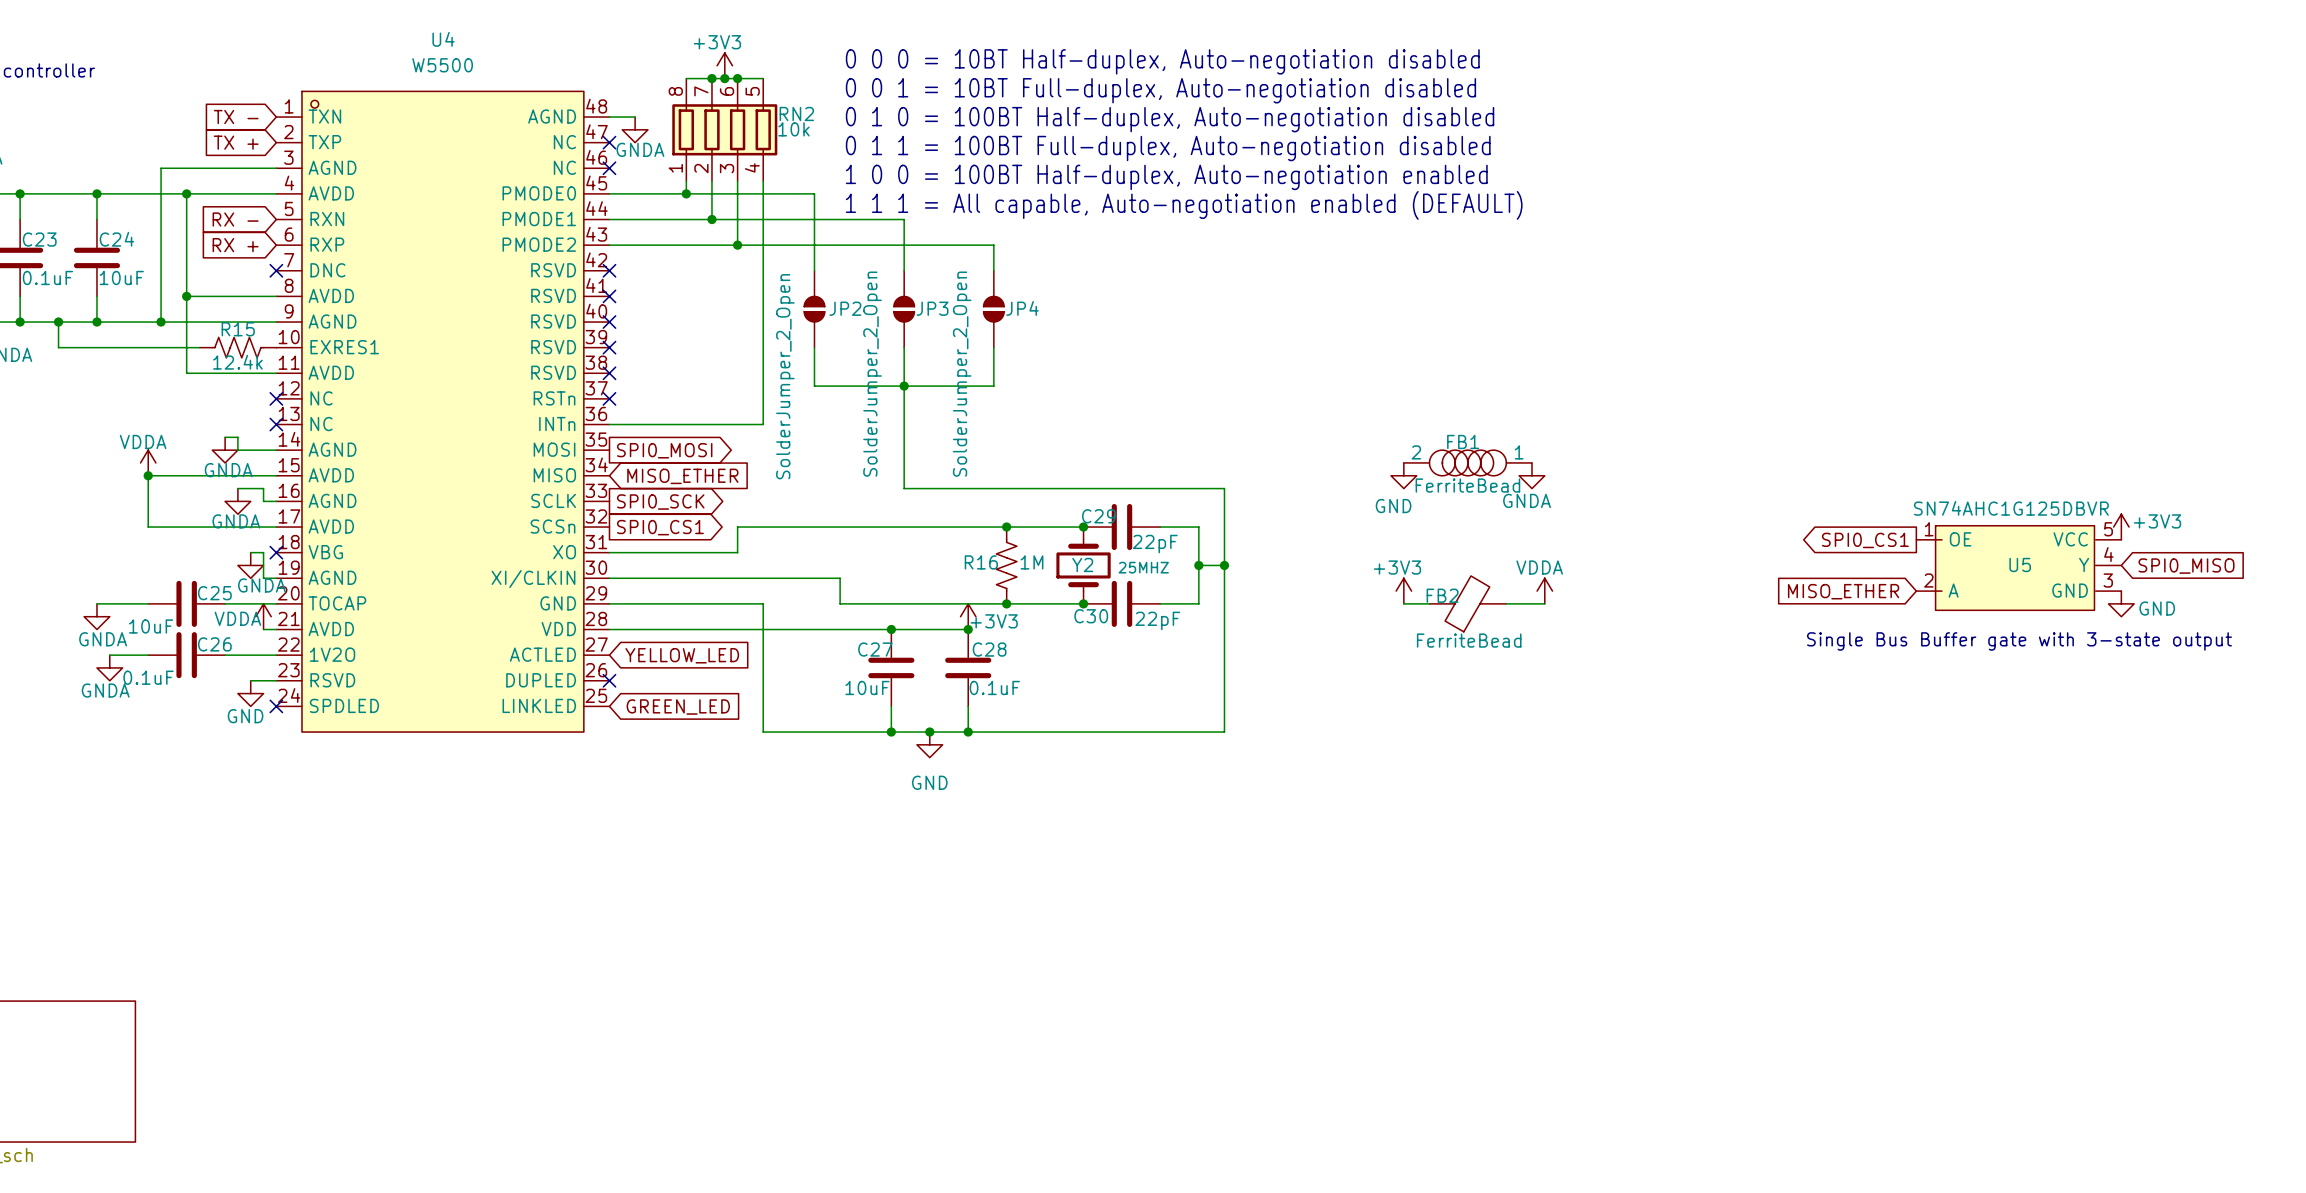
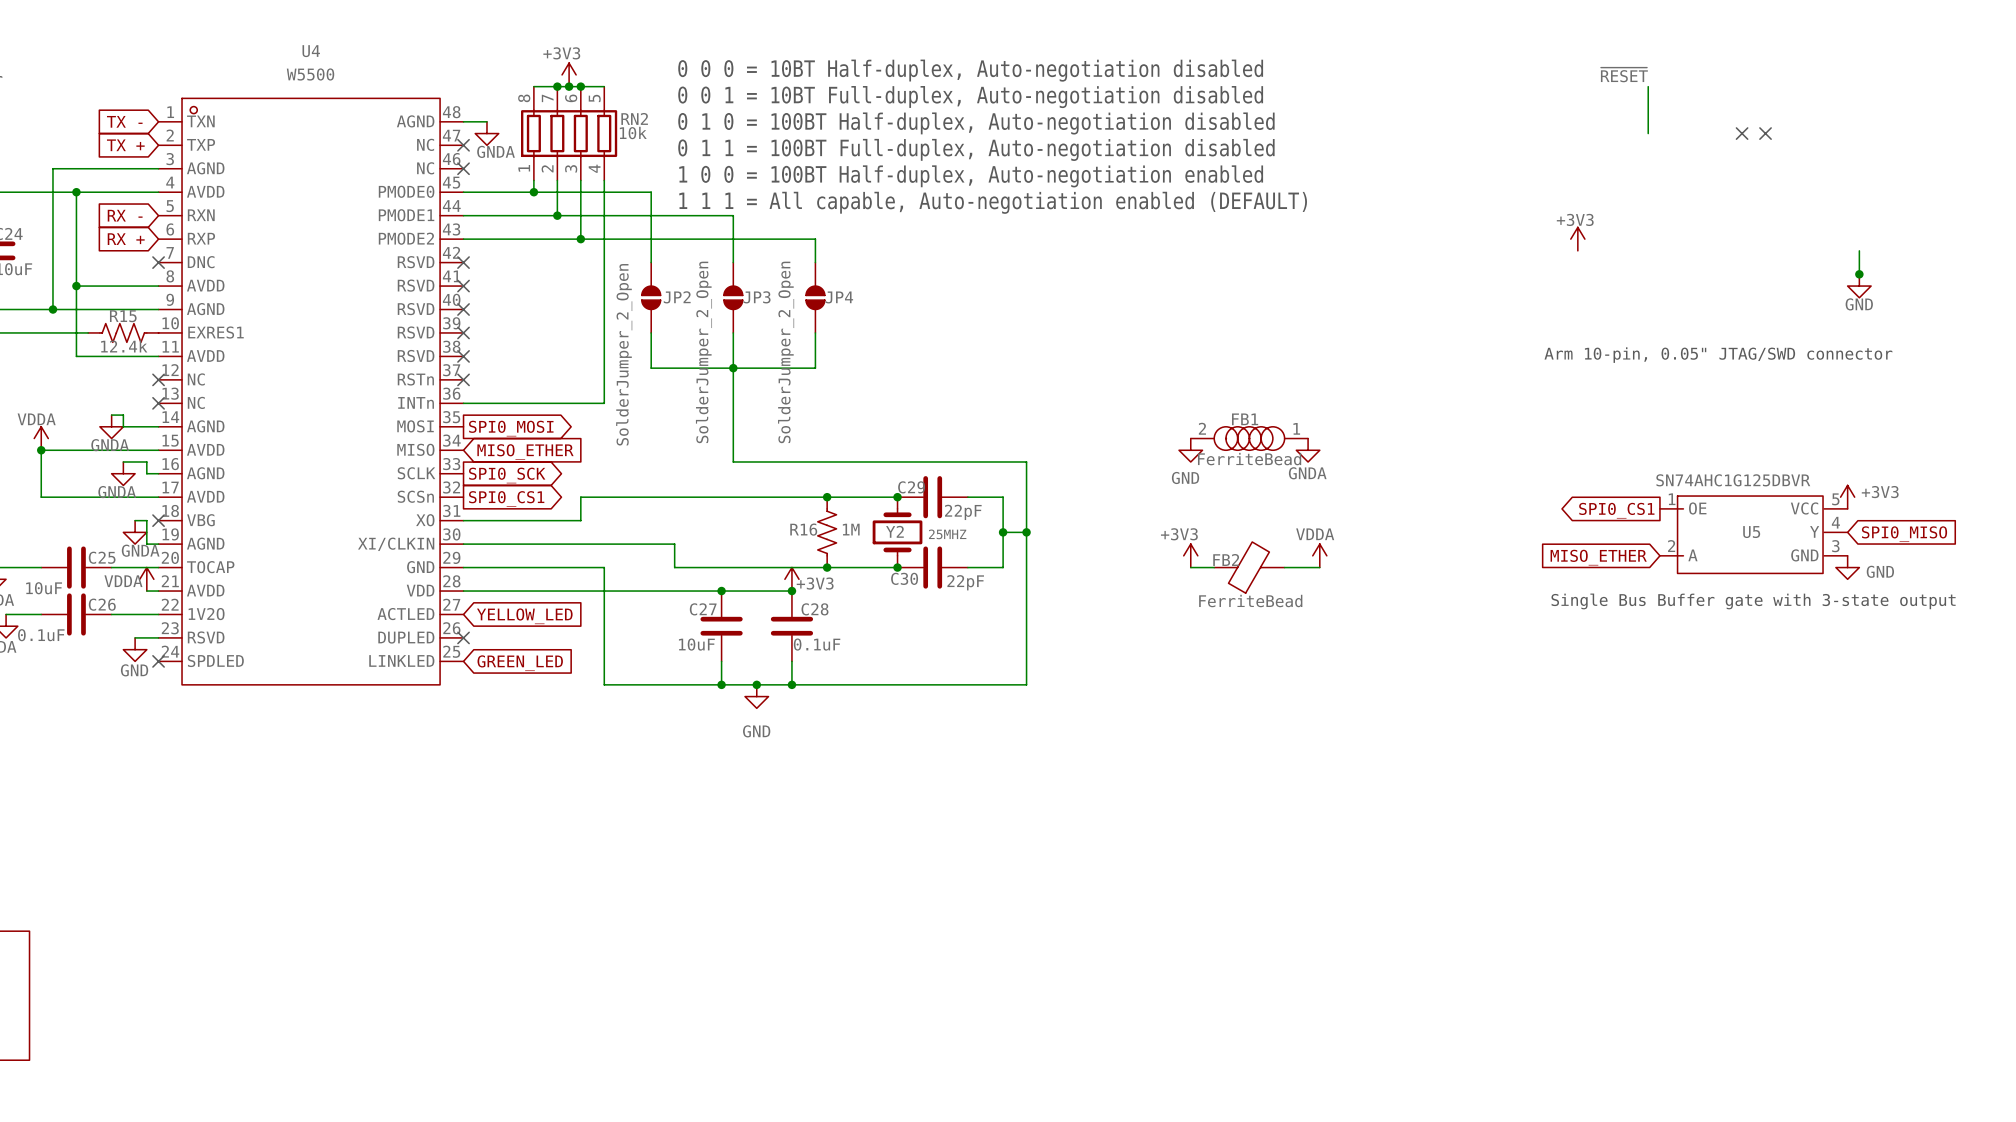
label: none -> ~{RESET} (1624, 74)
wire: none -> (1648, 86) (1648, 133)
no-connect mark: none -> (1742, 133)
no-connect mark: none -> (1765, 133)
power symbol: none -> +3V3 (1577, 239)
wire: none -> (1859, 250) (1859, 274)
junction: none -> (1859, 274)
power symbol: none -> GND (1859, 286)
text: none -> Arm 10-pin, 0.05" JTAG/SWD connector (1718, 355)

